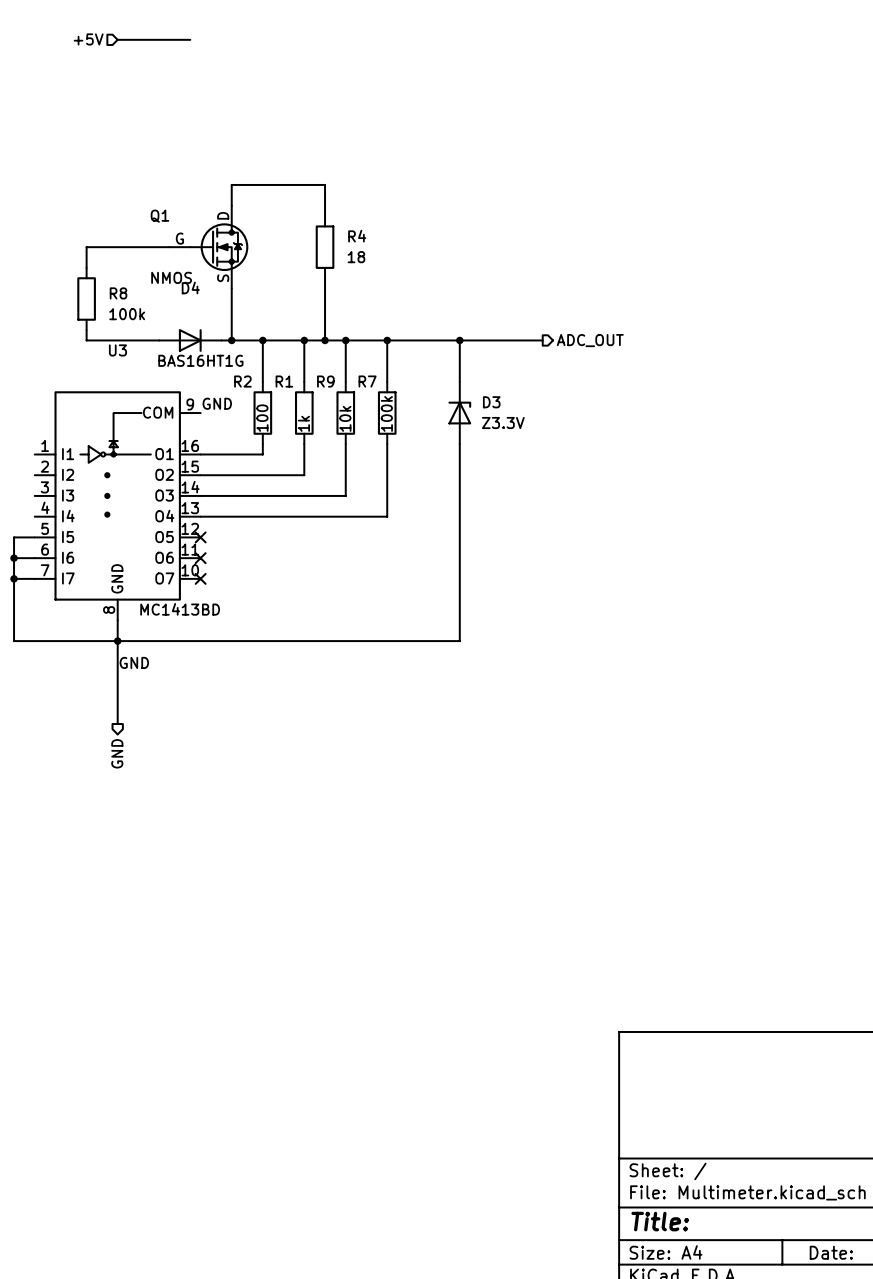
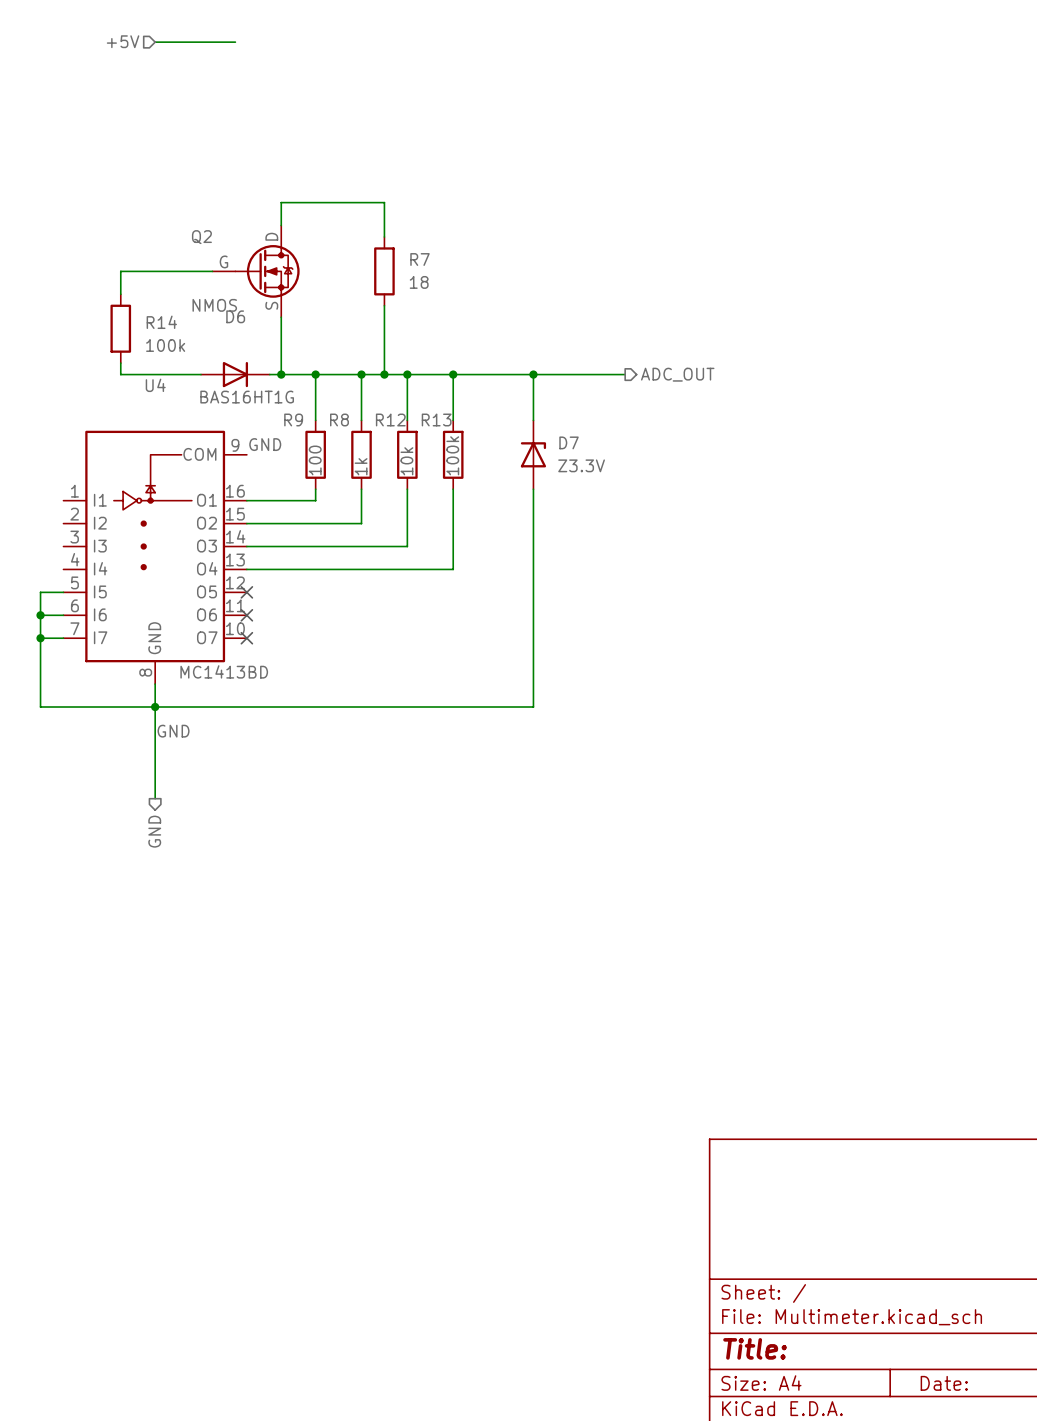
Q1 name: Q1 (159, 216) -> Q2 (201, 237)
R4 name: R4 (357, 236) -> R7 (420, 259)
D4 name: D4 (190, 287) -> D6 (235, 316)
R8 name: R8 (118, 293) -> R14 (161, 322)
U3 name: U3 (117, 350) -> U4 (155, 385)
R2 name: R2 (242, 381) -> R9 (293, 419)
R1 name: R1 (284, 381) -> R8 (339, 419)
R9 name: R9 (325, 381) -> R12 (390, 419)
R7 name: R7 (367, 381) -> R13 (436, 419)
D3 name: D3 (491, 402) -> D7 (569, 442)

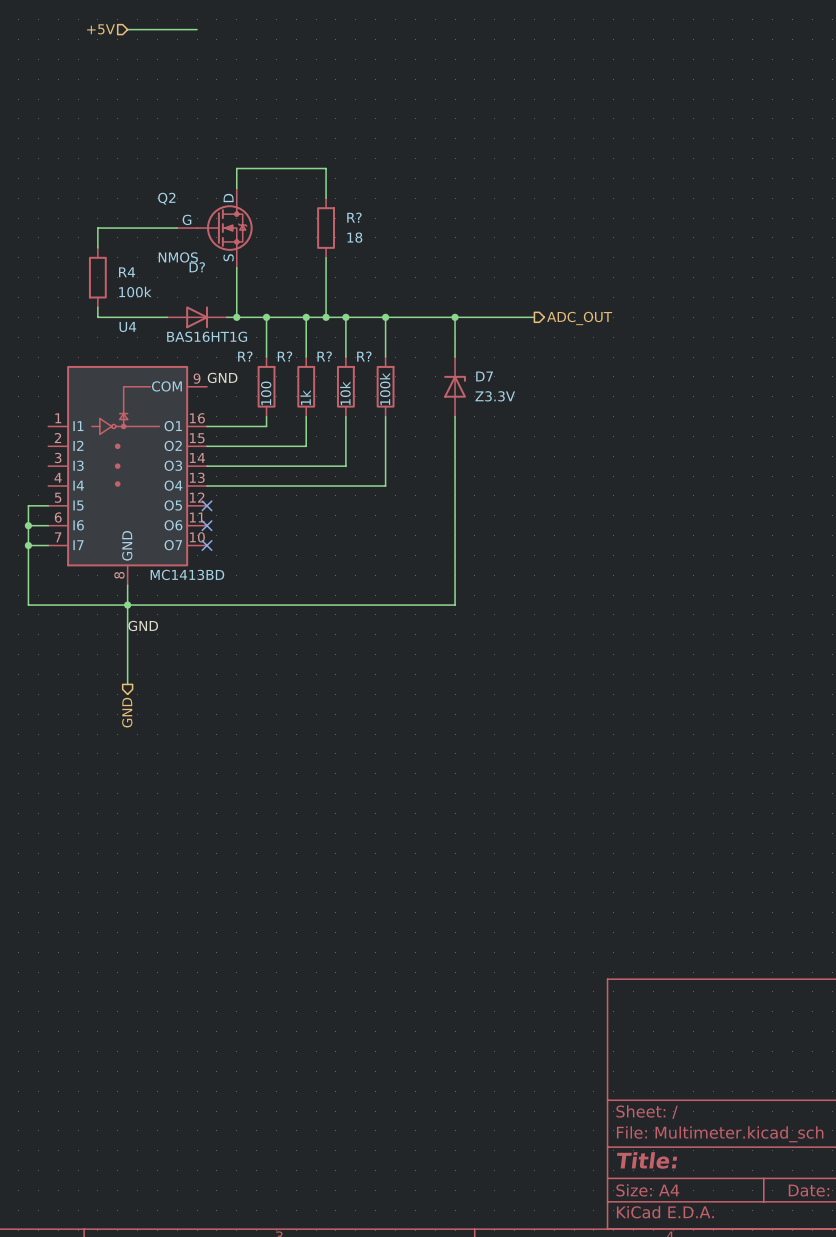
R7 name: R7 (420, 259) -> R? (354, 217)
D6 name: D6 (235, 316) -> D? (197, 267)
R14 name: R14 (161, 322) -> R4 (127, 272)
R9 name: R9 (293, 419) -> R? (245, 356)
R8 name: R8 (339, 419) -> R? (284, 356)
R12 name: R12 (390, 419) -> R? (324, 356)
R13 name: R13 (436, 419) -> R? (364, 356)

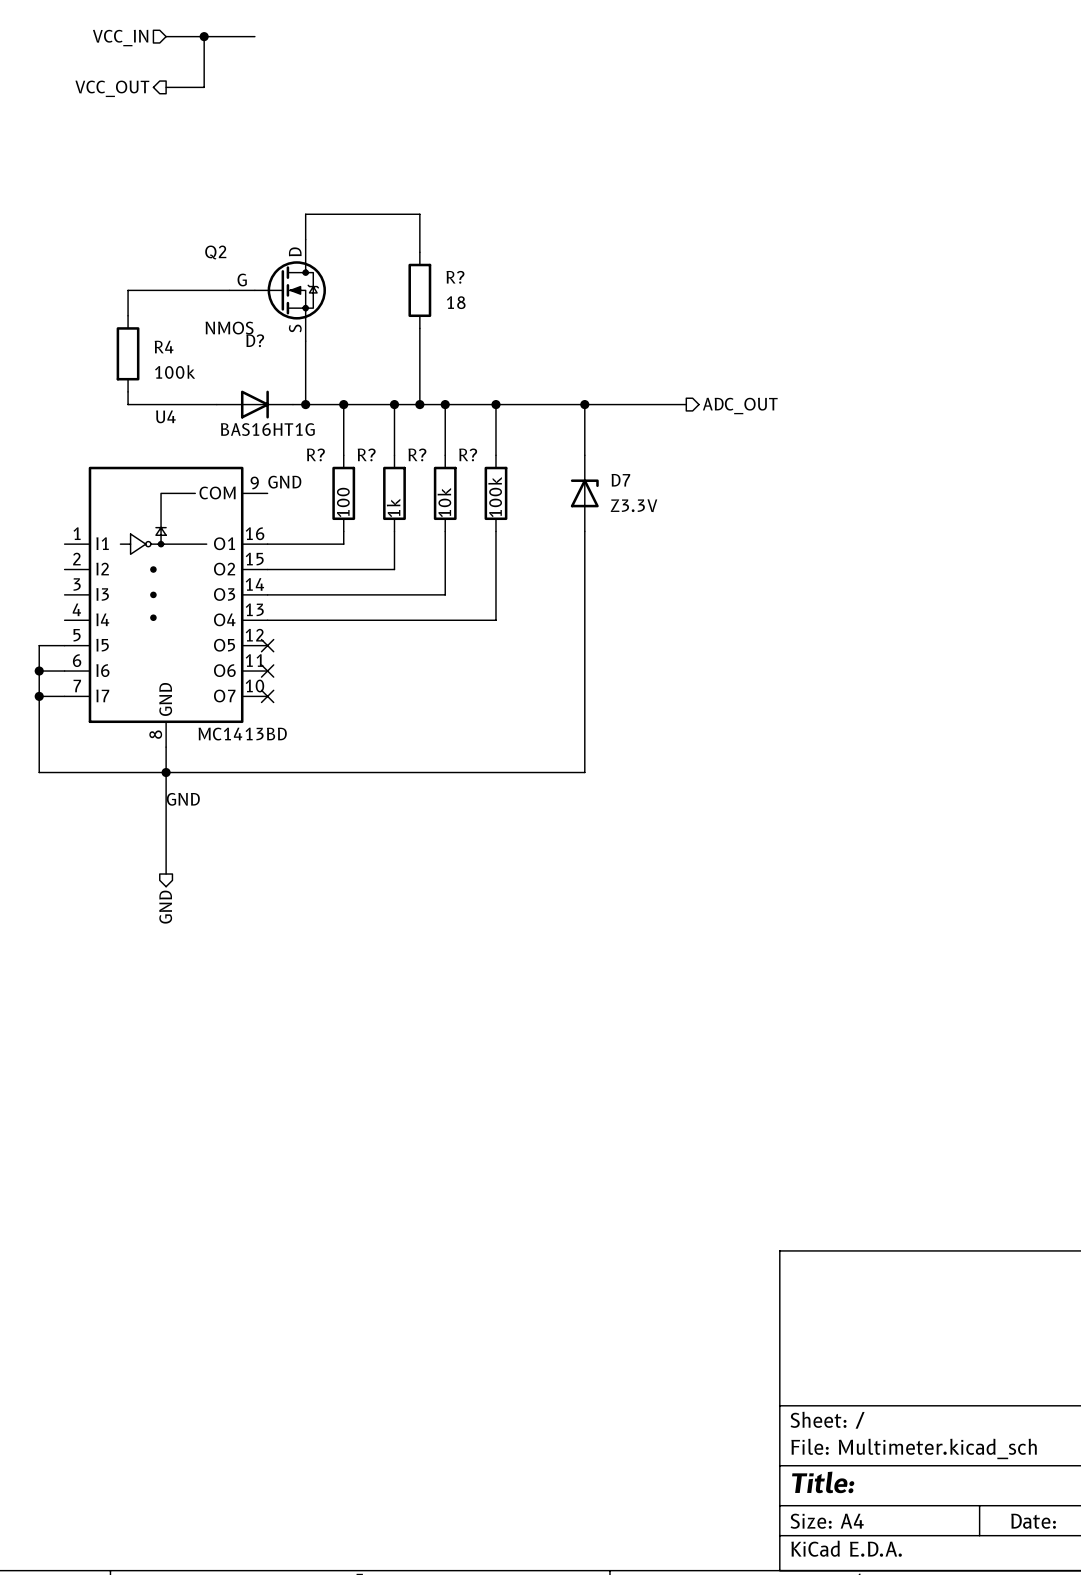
hierarchical label: +5V (101, 29) -> VCC_IN (120, 38)
wire: none -> (204, 36) (204, 87) (166, 87)
junction: none -> (204, 36)
hierarchical label: none -> VCC_OUT (112, 88)

